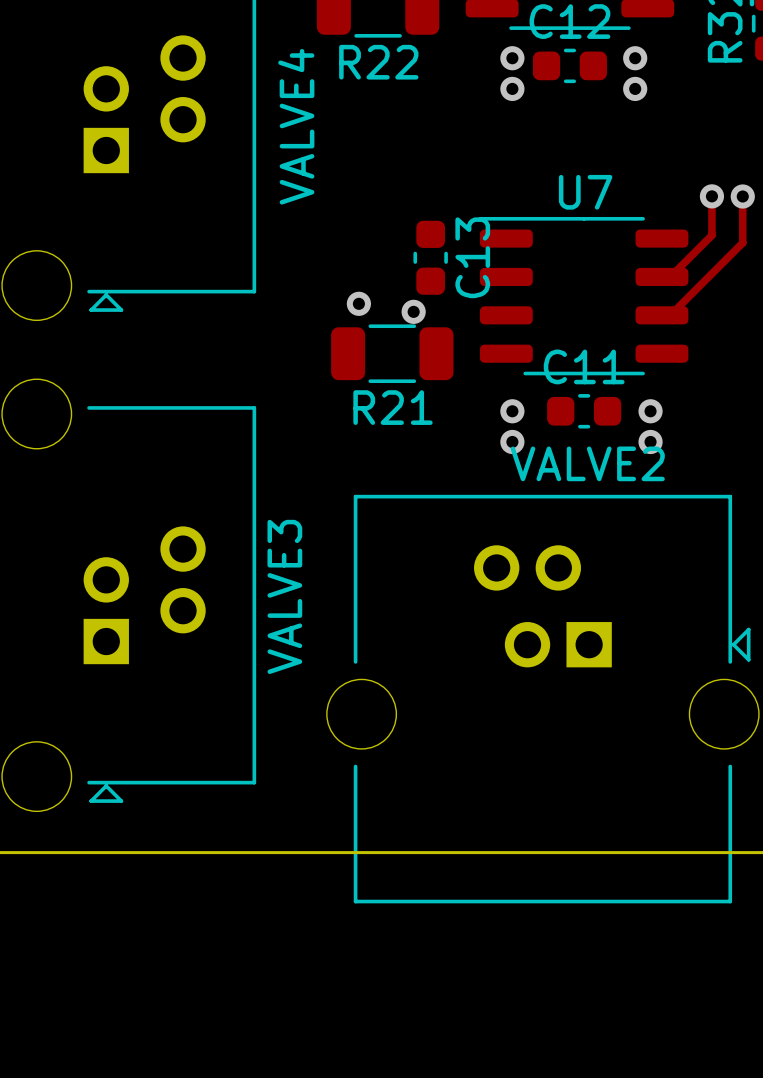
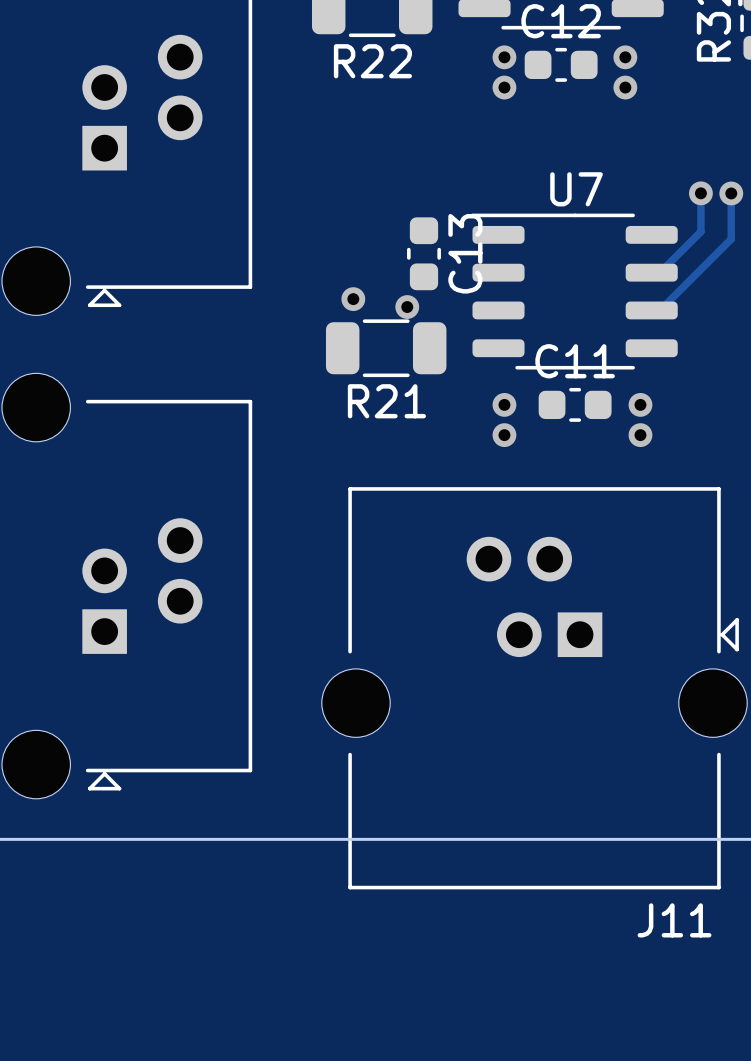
part value: VALVE4 (296, 126) -> none
J11 value: VALVE2 (587, 463) -> none
part value: VALVE3 (284, 596) -> none
J11 name: none -> J11 (674, 920)

